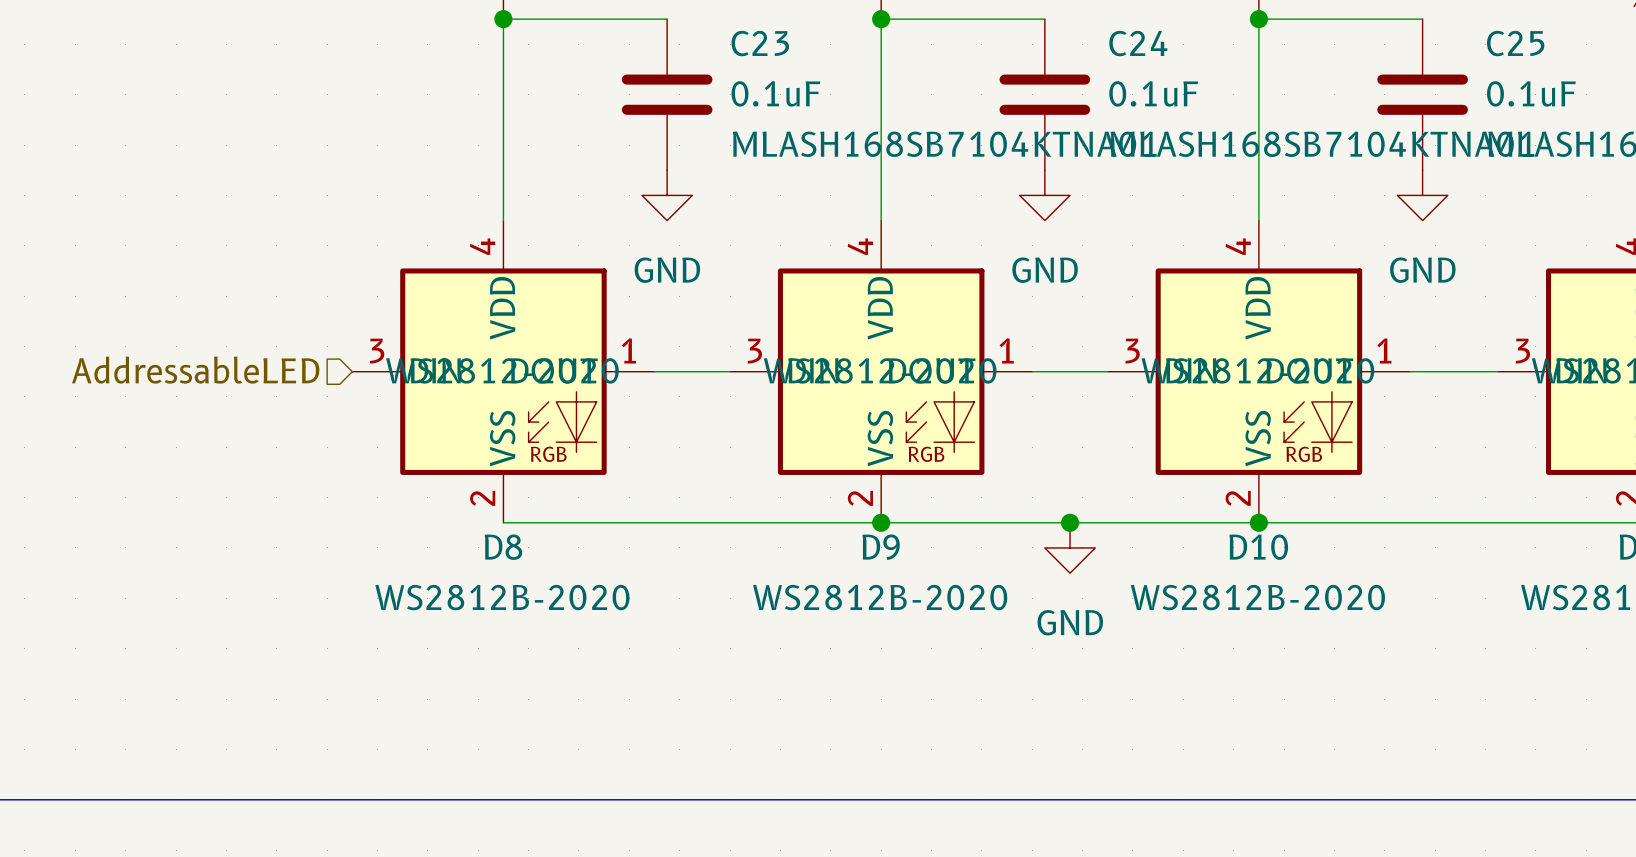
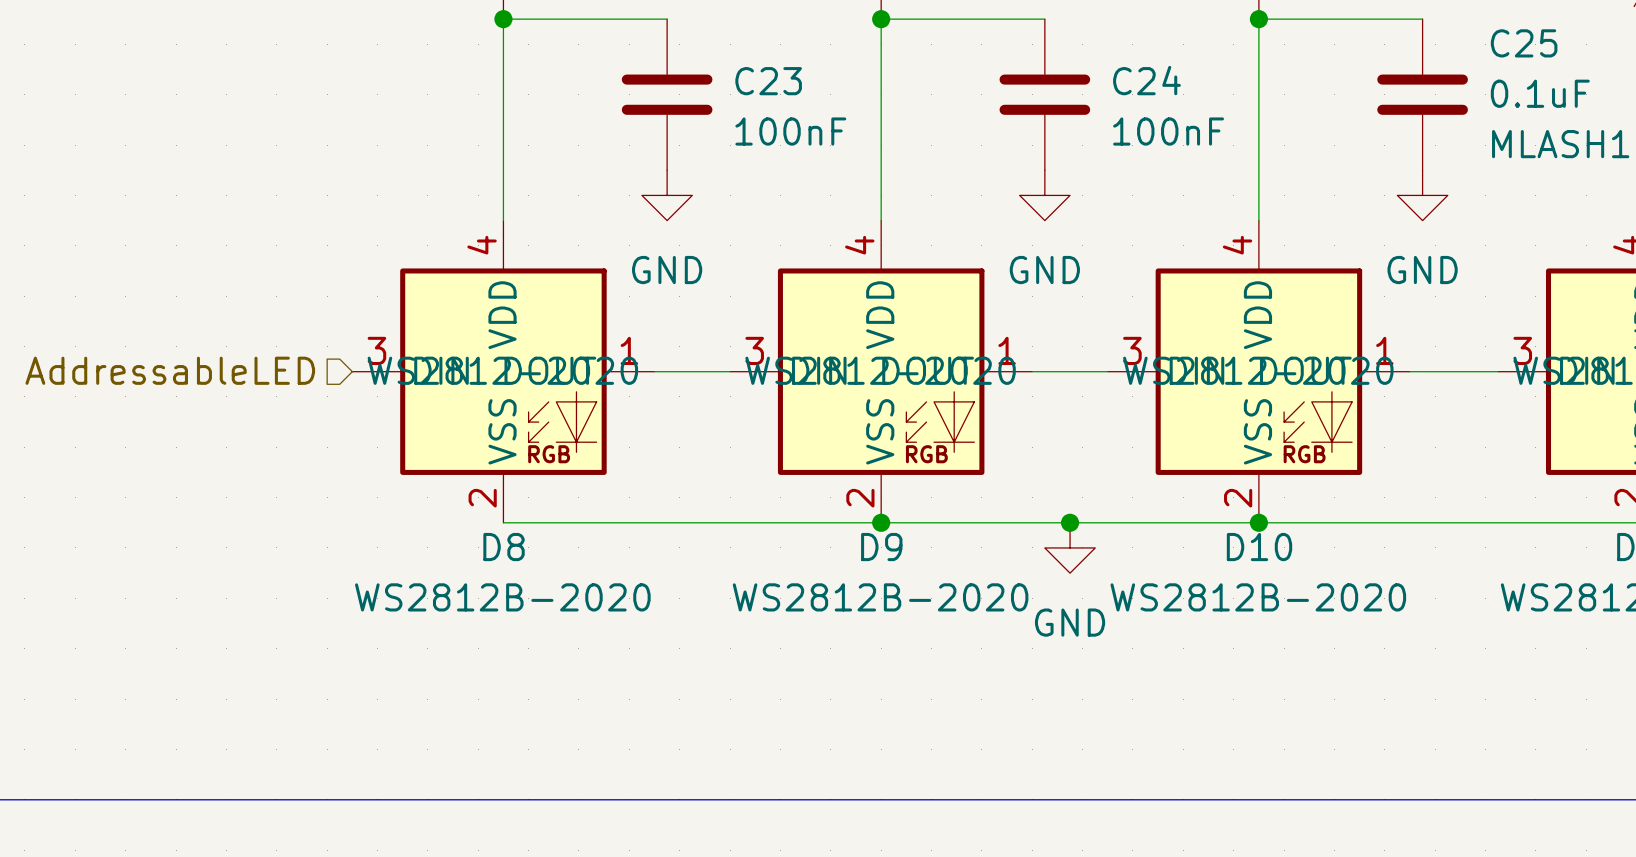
C23 name position: C23 (760, 43) -> C23 (768, 81)
C24 name position: C24 (1138, 43) -> C24 (1146, 80)
C23 value: 0.1uF (775, 93) -> 100nF (790, 131)
C24 value: 0.1uF (1153, 93) -> 100nF (1168, 131)
C23 text: MLASH168SB7104KTNA01 (944, 144) -> none
C24 text: MLASH168SB7104KTNA01 (1322, 144) -> none

